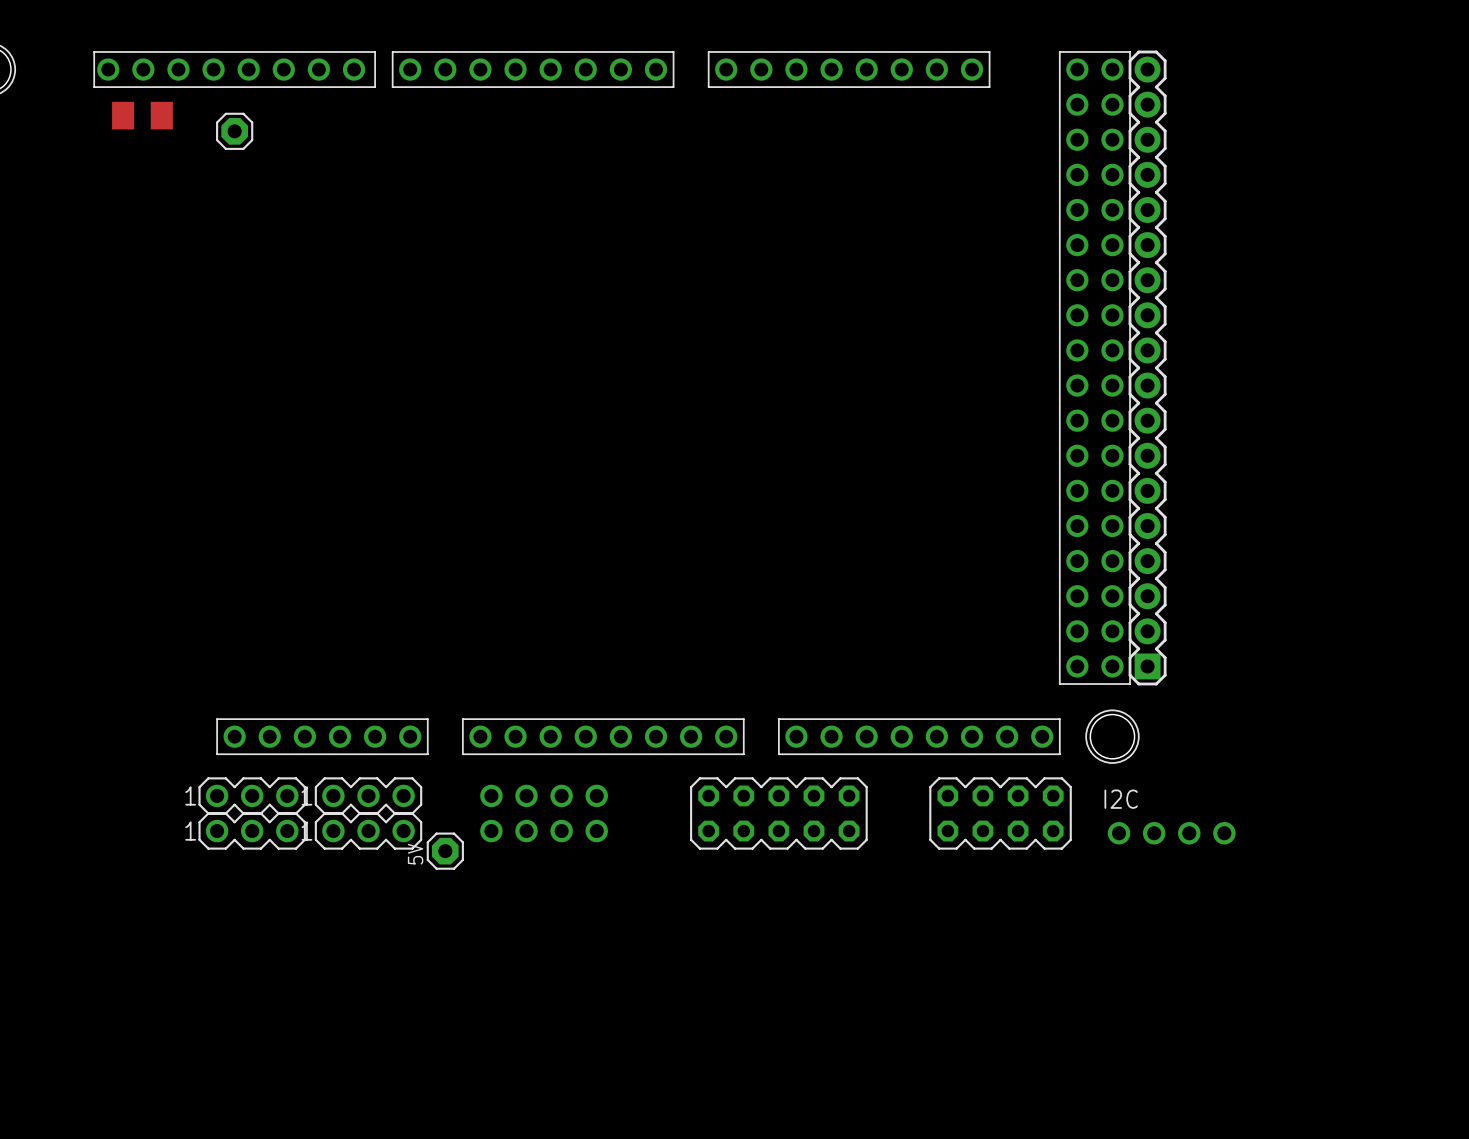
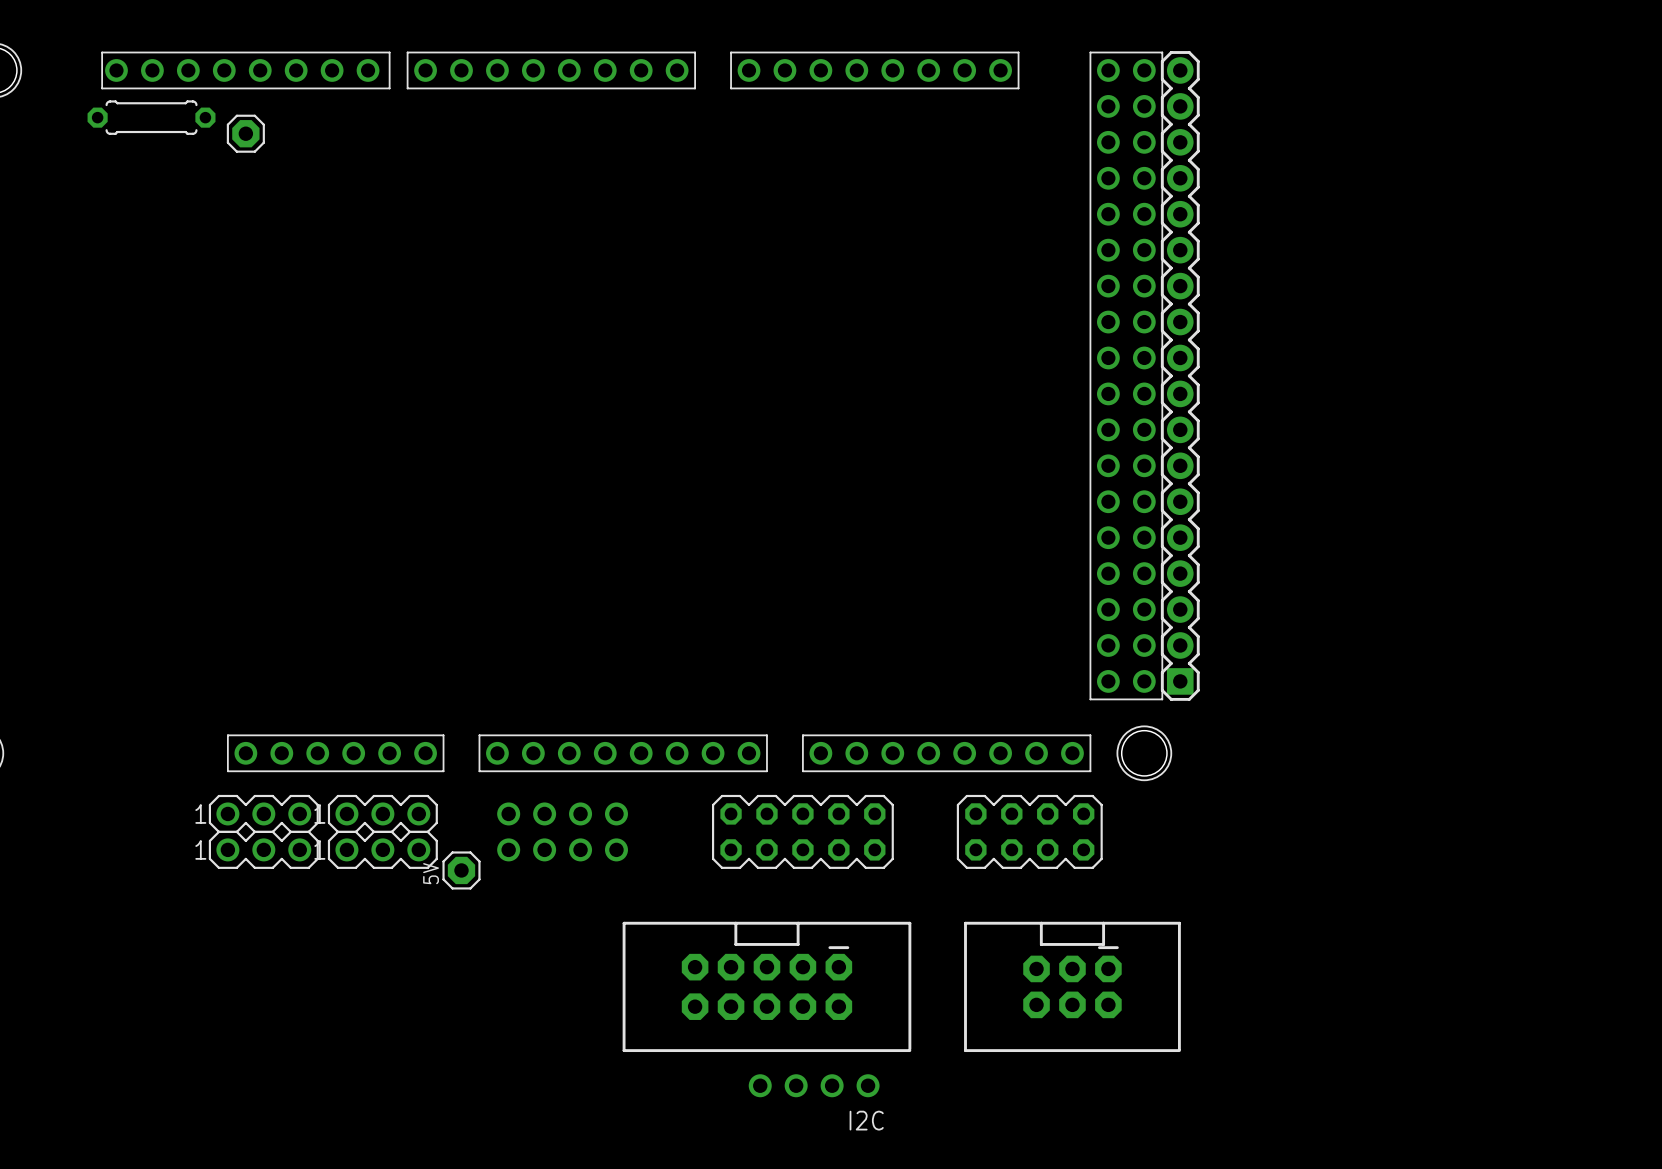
part footprint: [112, 101, 173, 130] -> [87, 100, 216, 135]
I2C name position: I2C (1121, 799) -> I2C (866, 1120)
I2C position: (1171, 833) -> (814, 1085)
part: none -> (766, 986)
part: none -> (1072, 986)

